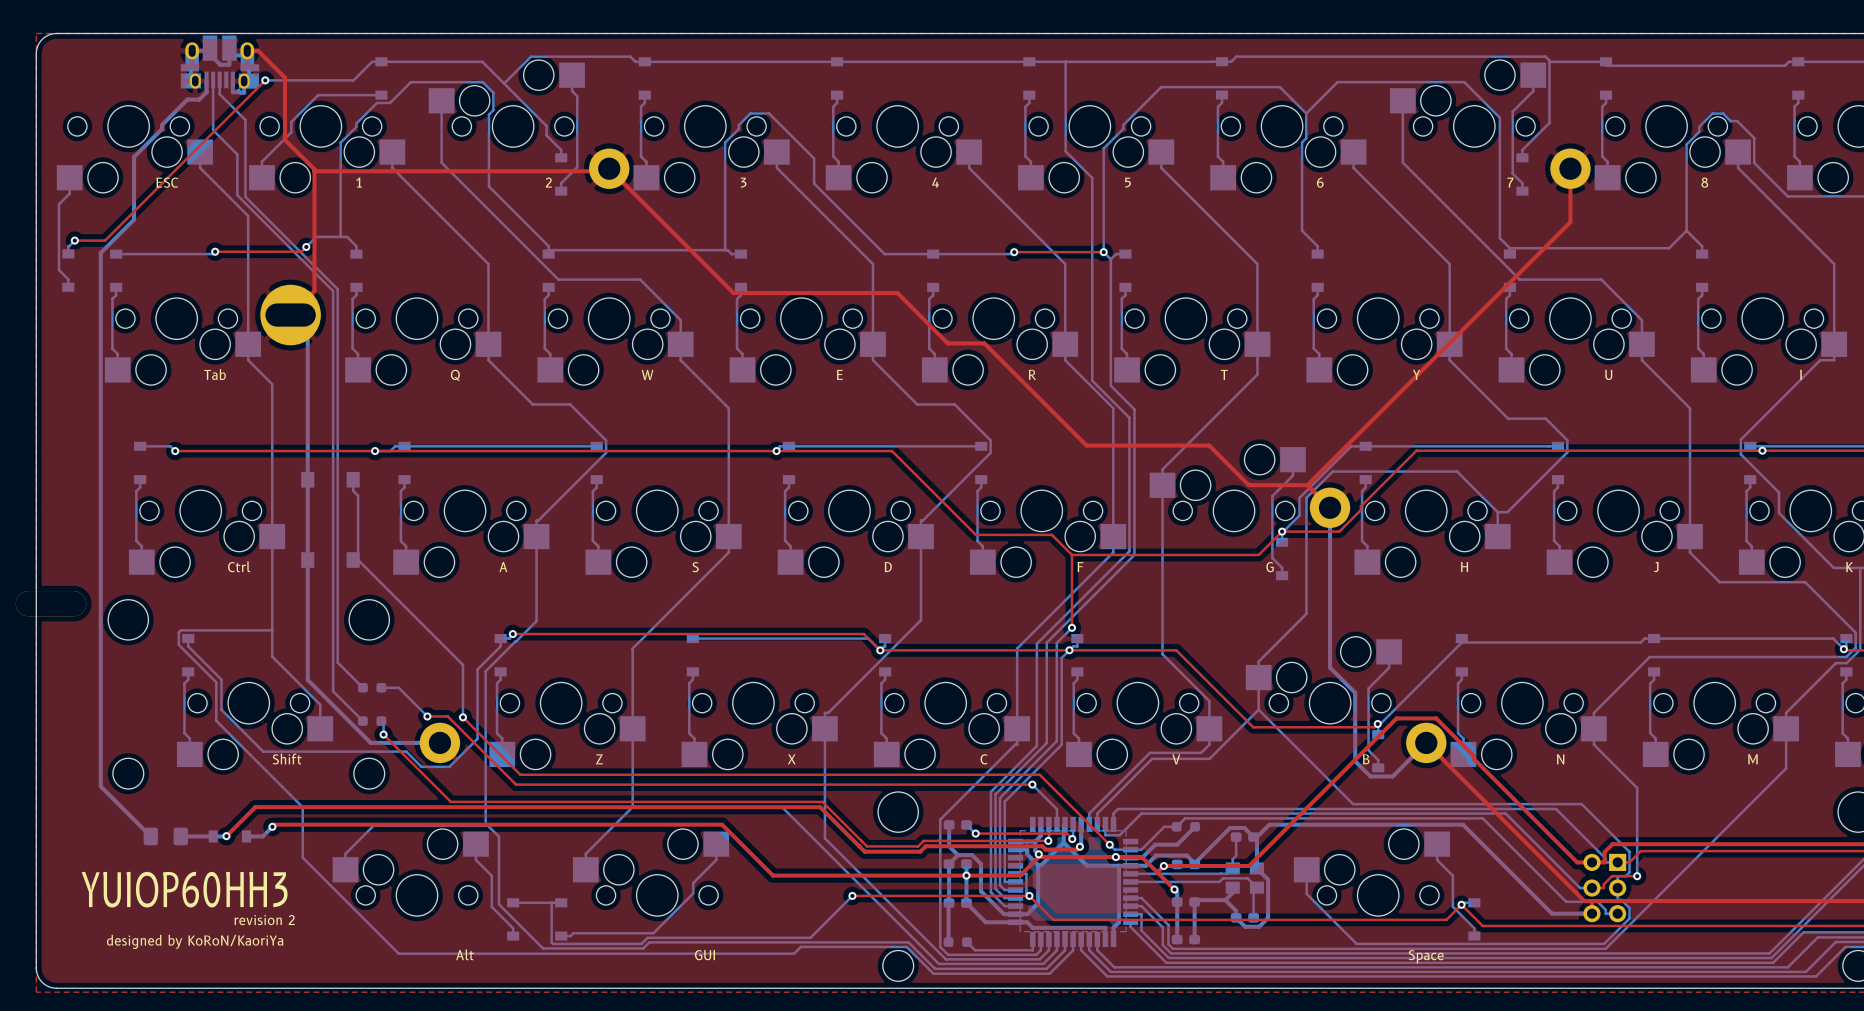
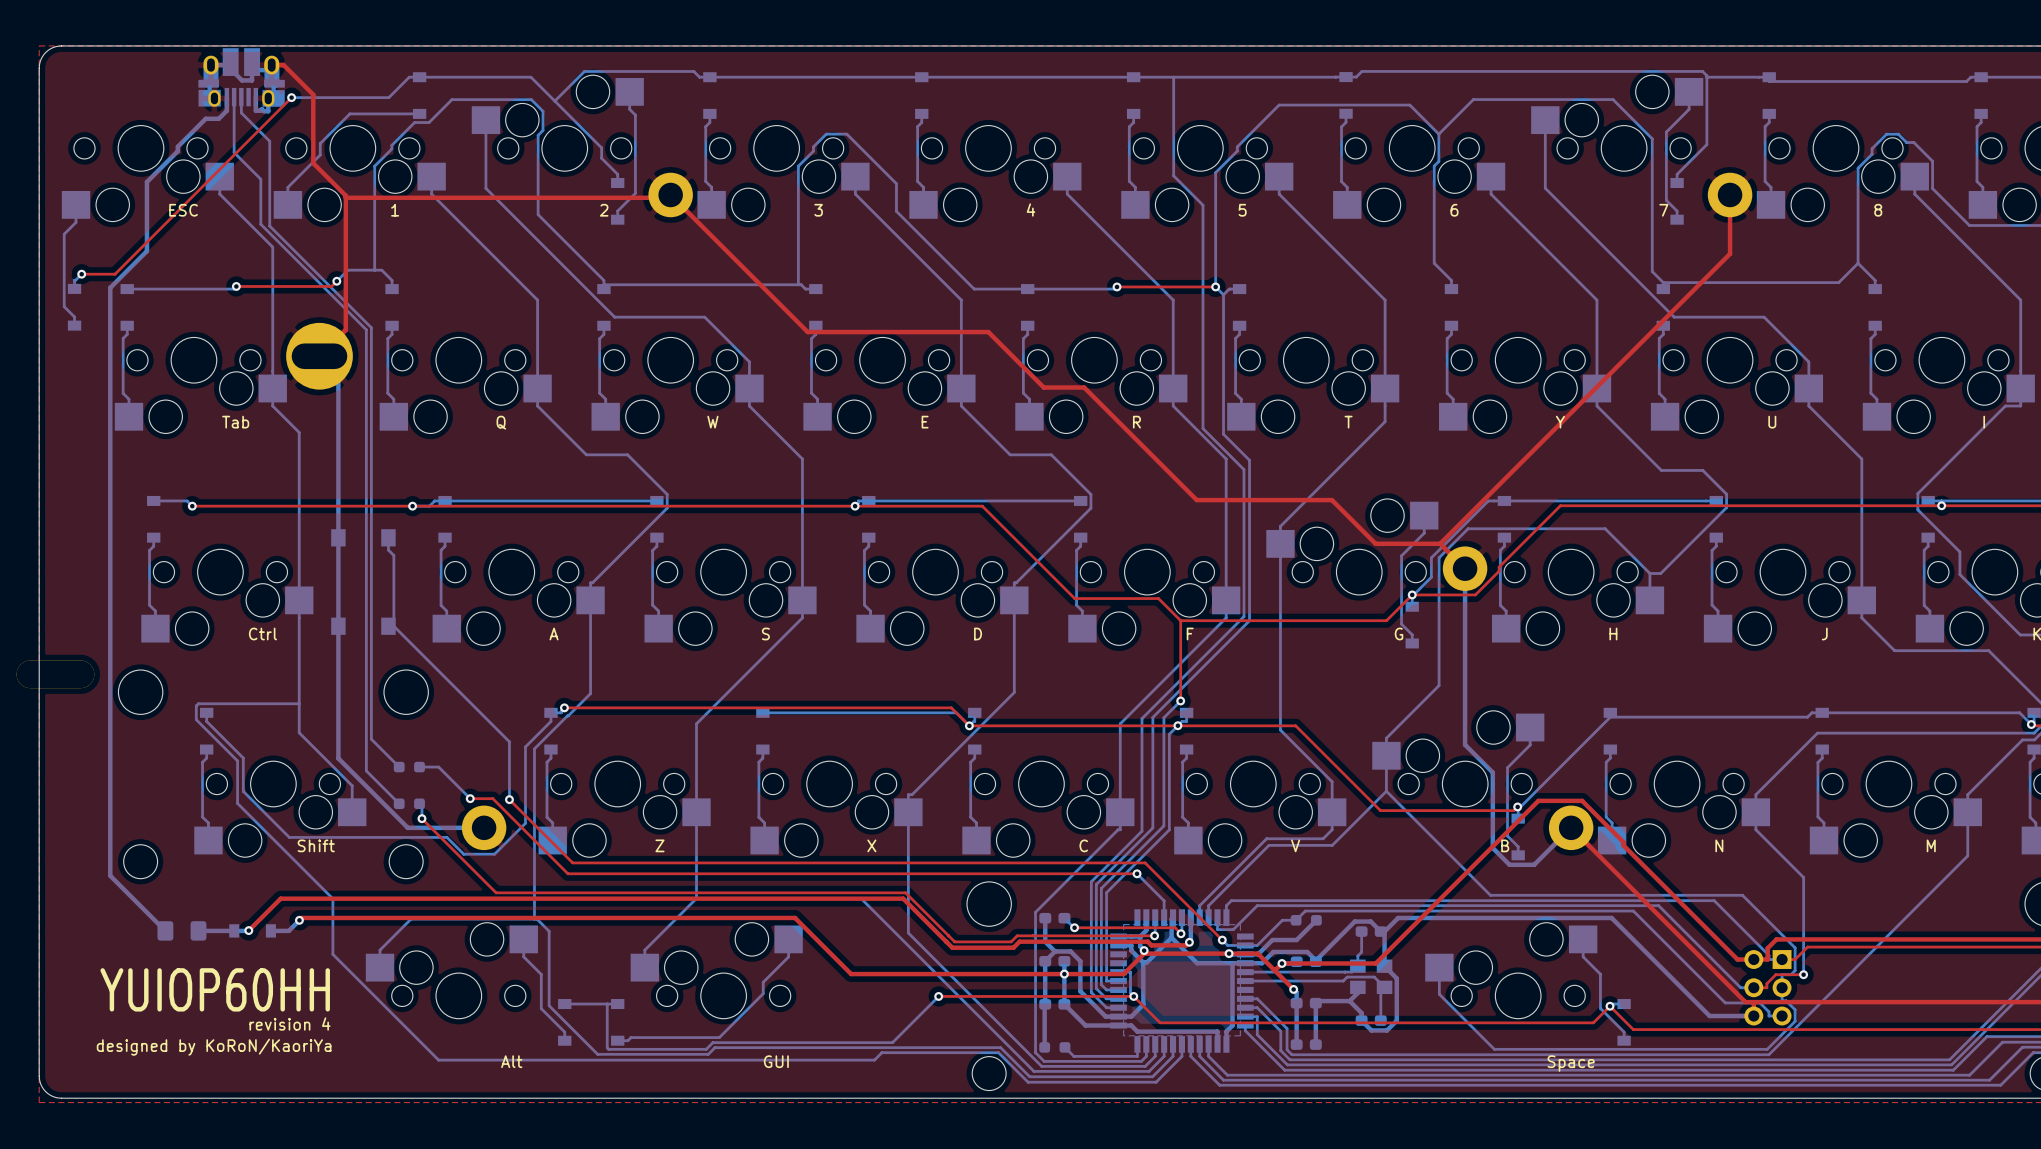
text: YUIOP60HH3 (184, 889) -> YUIOP60HH (215, 989)
text: revision 2 (264, 920) -> revision 4 (289, 1024)

